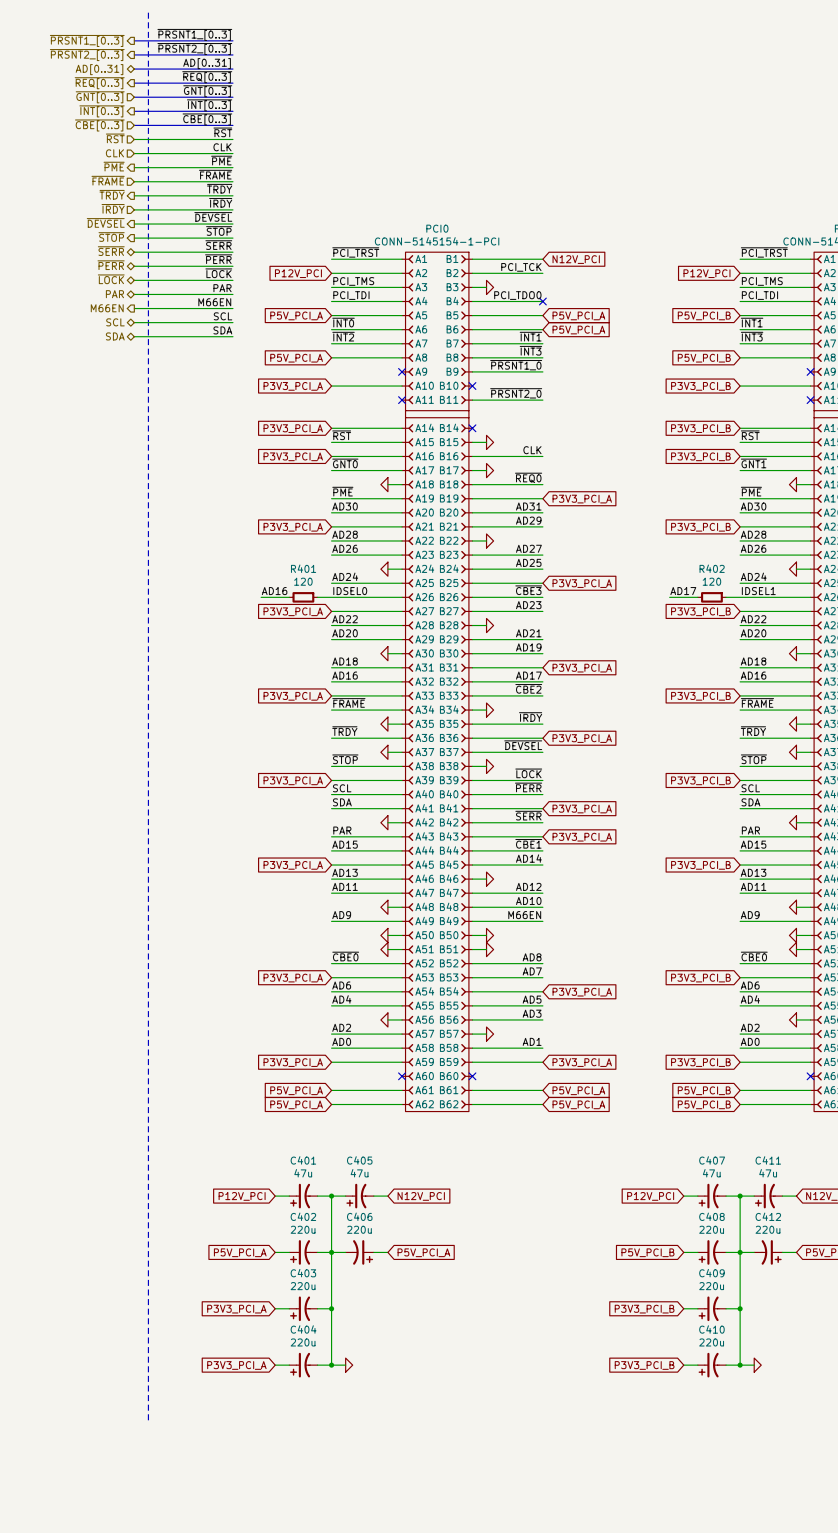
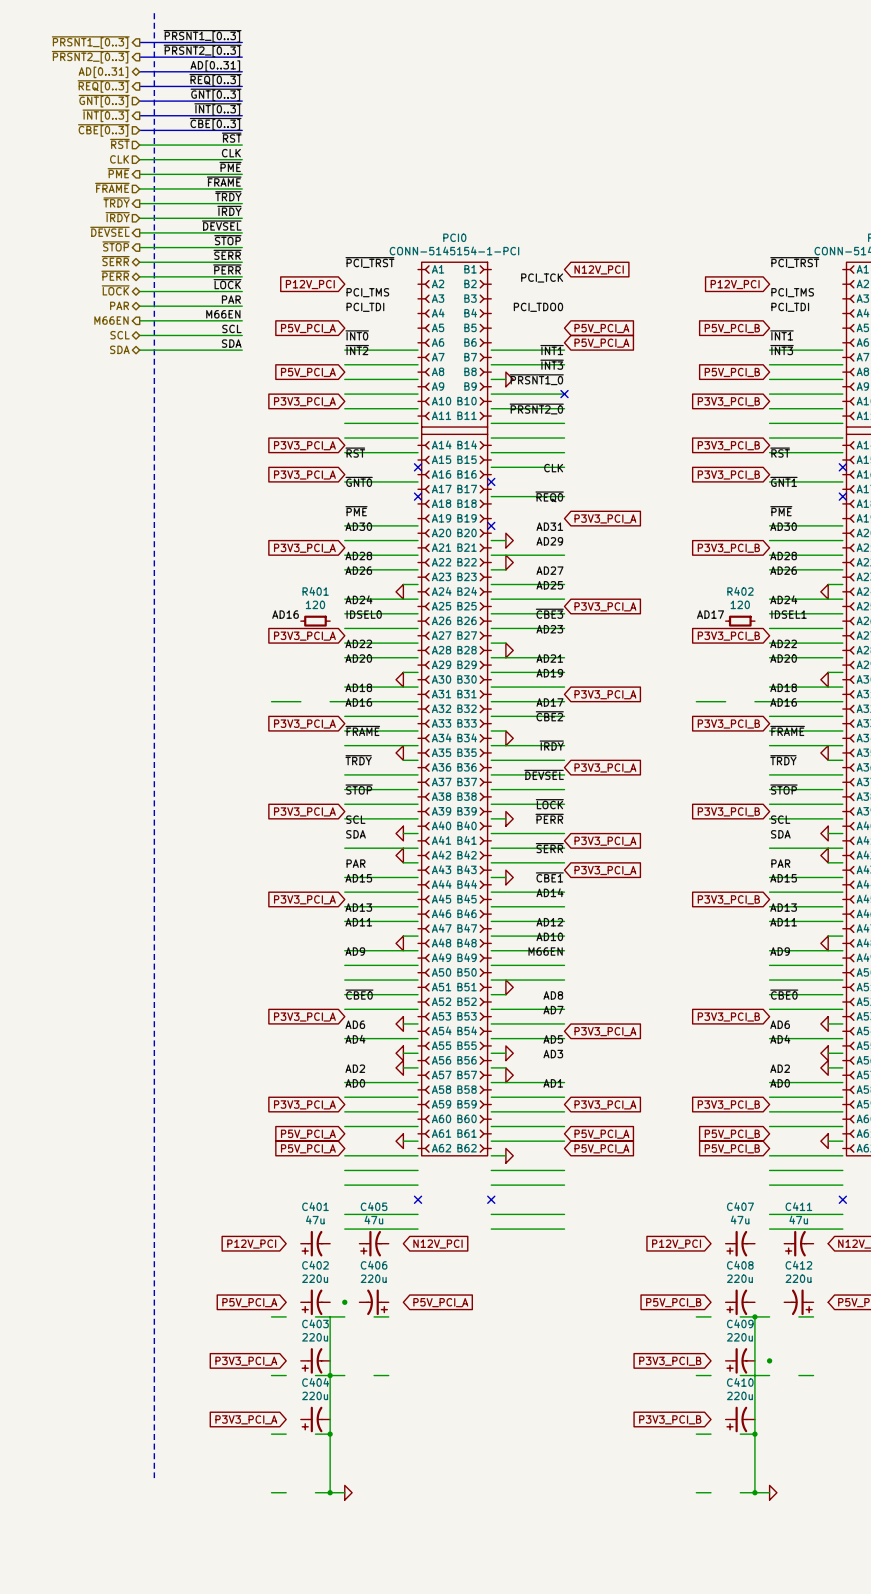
wire: (331, 259) (402, 259) -> (344, 350) (418, 350)
wire: (472, 259) (542, 259) -> (491, 350) (564, 350)
wire: (740, 259) (810, 259) -> (769, 350) (842, 350)
wire: (331, 273) (402, 273) -> (344, 364) (418, 364)
wire: (472, 273) (542, 273) -> (491, 364) (564, 364)
wire: (740, 273) (810, 273) -> (769, 364) (842, 364)
wire: (331, 287) (402, 287) -> (344, 379) (418, 379)
wire: (472, 287) (486, 287) -> (491, 379) (505, 379)
power symbol: (490, 287) -> none
wire: (740, 287) (810, 287) -> (769, 379) (842, 379)
wire: (331, 301) (402, 301) -> (344, 394) (418, 394)
wire: (472, 301) (542, 301) -> (491, 394) (564, 394)
no-connect mark: (542, 301) -> none
wire: (740, 301) (810, 301) -> (769, 394) (842, 394)
wire: (331, 315) (402, 315) -> (344, 408) (418, 408)
wire: (472, 315) (542, 315) -> (491, 408) (564, 408)
wire: (740, 315) (810, 315) -> (769, 408) (842, 408)
wire: (331, 329) (402, 329) -> (344, 423) (418, 423)
wire: (472, 329) (542, 329) -> (491, 423) (564, 423)
wire: (740, 329) (810, 329) -> (769, 423) (842, 423)
wire: (331, 343) (402, 343) -> (344, 438) (418, 438)
wire: (472, 343) (542, 343) -> (491, 438) (564, 438)
wire: (740, 343) (810, 343) -> (769, 438) (842, 438)
wire: (331, 357) (402, 357) -> (344, 452) (418, 452)
wire: (472, 357) (542, 357) -> (491, 452) (564, 452)
wire: (740, 357) (810, 357) -> (769, 452) (842, 452)
power symbol: none -> (509, 379)
no-connect mark: (402, 371) -> none
wire: (472, 371) (542, 371) -> (491, 467) (564, 467)
no-connect mark: (810, 371) -> none
no-connect mark: none -> (564, 394)
wire: (331, 386) (402, 386) -> (344, 481) (418, 481)
no-connect mark: (472, 386) -> none
wire: (740, 386) (810, 386) -> (769, 481) (842, 481)
no-connect mark: (402, 400) -> none
wire: (472, 400) (542, 400) -> (491, 496) (564, 496)
no-connect mark: (810, 400) -> none
wire: (331, 428) (402, 428) -> (344, 525) (418, 525)
no-connect mark: (472, 428) -> none
wire: (740, 428) (810, 428) -> (769, 525) (842, 525)
wire: (331, 442) (402, 442) -> (344, 540) (418, 540)
wire: (472, 442) (486, 442) -> (491, 540) (505, 540)
power symbol: (490, 442) -> none
wire: (740, 442) (810, 442) -> (769, 540) (842, 540)
no-connect mark: none -> (418, 467)
no-connect mark: none -> (842, 467)
wire: (331, 456) (402, 456) -> (344, 555) (418, 555)
wire: (472, 456) (542, 456) -> (491, 555) (564, 555)
wire: (740, 456) (810, 456) -> (769, 555) (842, 555)
no-connect mark: none -> (491, 481)
wire: (331, 470) (402, 470) -> (344, 569) (418, 569)
wire: (472, 470) (486, 470) -> (491, 569) (505, 569)
power symbol: (490, 470) -> none
wire: (740, 470) (810, 470) -> (769, 569) (842, 569)
no-connect mark: none -> (418, 496)
no-connect mark: none -> (842, 496)
power symbol: (384, 484) -> none
wire: (387, 484) (402, 484) -> (403, 584) (418, 584)
wire: (472, 484) (542, 484) -> (491, 584) (564, 584)
power symbol: (792, 484) -> none
wire: (796, 484) (810, 484) -> (828, 584) (842, 584)
wire: (331, 498) (402, 498) -> (344, 599) (418, 599)
wire: (472, 498) (542, 498) -> (491, 599) (564, 599)
wire: (740, 498) (810, 498) -> (769, 599) (842, 599)
no-connect mark: none -> (491, 525)
wire: (331, 512) (402, 512) -> (344, 613) (418, 613)
wire: (472, 512) (542, 512) -> (491, 613) (564, 613)
wire: (740, 512) (810, 512) -> (769, 613) (842, 613)
power symbol: none -> (509, 540)
wire: (331, 526) (402, 526) -> (344, 628) (418, 628)
wire: (472, 526) (542, 526) -> (491, 628) (564, 628)
wire: (740, 526) (810, 526) -> (769, 628) (842, 628)
wire: (331, 540) (402, 540) -> (344, 643) (418, 643)
wire: (472, 540) (486, 540) -> (491, 643) (505, 643)
wire: (740, 540) (810, 540) -> (769, 643) (842, 643)
wire: (331, 555) (402, 555) -> (344, 657) (418, 657)
wire: (472, 555) (542, 555) -> (491, 657) (564, 657)
wire: (740, 555) (810, 555) -> (769, 657) (842, 657)
wire: (387, 569) (402, 569) -> (403, 672) (418, 672)
wire: (472, 569) (542, 569) -> (491, 672) (564, 672)
wire: (796, 569) (810, 569) -> (828, 672) (842, 672)
wire: (331, 583) (402, 583) -> (344, 687) (418, 687)
wire: (472, 583) (542, 583) -> (491, 687) (564, 687)
wire: (740, 583) (810, 583) -> (769, 687) (842, 687)
wire: (261, 597) (289, 597) -> (271, 701) (300, 701)
wire: (317, 597) (402, 597) -> (330, 701) (418, 701)
wire: (472, 597) (542, 597) -> (491, 701) (564, 701)
wire: (669, 597) (697, 597) -> (696, 701) (725, 701)
wire: (726, 597) (810, 597) -> (754, 701) (842, 701)
wire: (331, 611) (402, 611) -> (344, 716) (418, 716)
wire: (472, 611) (542, 611) -> (491, 716) (564, 716)
wire: (740, 611) (810, 611) -> (769, 716) (842, 716)
wire: (331, 625) (402, 625) -> (344, 730) (418, 730)
wire: (472, 625) (486, 625) -> (491, 730) (505, 730)
wire: (740, 625) (810, 625) -> (769, 730) (842, 730)
wire: (331, 639) (402, 639) -> (344, 745) (418, 745)
wire: (472, 639) (542, 639) -> (491, 745) (564, 745)
wire: (740, 639) (810, 639) -> (769, 745) (842, 745)
wire: (387, 653) (402, 653) -> (403, 760) (418, 760)
wire: (472, 653) (542, 653) -> (491, 760) (564, 760)
wire: (796, 653) (810, 653) -> (828, 760) (842, 760)
wire: (331, 667) (402, 667) -> (344, 774) (418, 774)
wire: (472, 667) (542, 667) -> (491, 774) (564, 774)
wire: (740, 667) (810, 667) -> (769, 774) (842, 774)
wire: (331, 681) (402, 681) -> (344, 789) (418, 789)
wire: (472, 681) (542, 681) -> (491, 789) (564, 789)
wire: (740, 681) (810, 681) -> (769, 789) (842, 789)
wire: (331, 695) (402, 695) -> (344, 804) (418, 804)
wire: (472, 695) (542, 695) -> (491, 804) (564, 804)
wire: (740, 695) (810, 695) -> (769, 804) (842, 804)
wire: (331, 710) (402, 710) -> (344, 818) (418, 818)
wire: (472, 710) (486, 710) -> (491, 818) (505, 818)
wire: (740, 710) (810, 710) -> (769, 818) (842, 818)
wire: (387, 724) (402, 724) -> (403, 833) (418, 833)
wire: (472, 724) (542, 724) -> (491, 833) (564, 833)
wire: (796, 724) (810, 724) -> (828, 833) (842, 833)
wire: (331, 738) (402, 738) -> (344, 848) (418, 848)
wire: (472, 738) (542, 738) -> (491, 848) (564, 848)
wire: (740, 738) (810, 738) -> (769, 848) (842, 848)
power symbol position: (384, 752) -> (399, 833)
wire: (387, 752) (402, 752) -> (403, 862) (418, 862)
wire: (472, 752) (542, 752) -> (491, 862) (564, 862)
power symbol position: (792, 752) -> (824, 833)
wire: (796, 752) (810, 752) -> (828, 862) (842, 862)
wire: (331, 766) (402, 766) -> (344, 877) (418, 877)
wire: (472, 766) (486, 766) -> (491, 877) (505, 877)
power symbol position: (490, 766) -> (509, 818)
wire: (740, 766) (810, 766) -> (769, 877) (842, 877)
wire: (331, 780) (402, 780) -> (344, 892) (418, 892)
wire: (472, 780) (542, 780) -> (491, 892) (564, 892)
wire: (740, 780) (810, 780) -> (769, 892) (842, 892)
wire: (331, 794) (402, 794) -> (344, 906) (418, 906)
wire: (472, 794) (542, 794) -> (491, 906) (564, 906)
wire: (740, 794) (810, 794) -> (769, 906) (842, 906)
wire: (331, 808) (402, 808) -> (344, 921) (418, 921)
wire: (472, 808) (542, 808) -> (491, 921) (564, 921)
wire: (740, 808) (810, 808) -> (769, 921) (842, 921)
wire: (387, 822) (402, 822) -> (403, 936) (418, 936)
wire: (472, 822) (542, 822) -> (491, 936) (564, 936)
wire: (796, 822) (810, 822) -> (828, 936) (842, 936)
wire: (331, 836) (402, 836) -> (344, 950) (418, 950)
wire: (472, 836) (542, 836) -> (491, 950) (564, 950)
wire: (740, 836) (810, 836) -> (769, 950) (842, 950)
wire: (331, 850) (402, 850) -> (344, 965) (418, 965)
wire: (472, 850) (542, 850) -> (491, 965) (564, 965)
wire: (740, 850) (810, 850) -> (769, 965) (842, 965)
wire: (331, 865) (402, 865) -> (344, 980) (418, 980)
wire: (472, 865) (542, 865) -> (491, 980) (564, 980)
wire: (740, 865) (810, 865) -> (769, 980) (842, 980)
wire: (331, 879) (402, 879) -> (344, 994) (418, 994)
wire: (472, 879) (486, 879) -> (491, 994) (505, 994)
power symbol position: (490, 879) -> (509, 877)
wire: (740, 879) (810, 879) -> (769, 994) (842, 994)
wire: (331, 893) (402, 893) -> (344, 1009) (418, 1009)
wire: (472, 893) (542, 893) -> (491, 1009) (564, 1009)
wire: (740, 893) (810, 893) -> (769, 1009) (842, 1009)
wire: (387, 907) (402, 907) -> (403, 1023) (418, 1023)
wire: (472, 907) (542, 907) -> (491, 1023) (564, 1023)
wire: (796, 907) (810, 907) -> (828, 1023) (842, 1023)
wire: (331, 921) (402, 921) -> (344, 1038) (418, 1038)
wire: (472, 921) (542, 921) -> (491, 1038) (564, 1038)
wire: (740, 921) (810, 921) -> (769, 1038) (842, 1038)
power symbol: (384, 935) -> none
wire: (387, 935) (402, 935) -> (403, 1053) (418, 1053)
wire: (472, 935) (486, 935) -> (491, 1053) (505, 1053)
power symbol: (490, 935) -> none
power symbol: (792, 935) -> none
wire: (796, 935) (810, 935) -> (828, 1053) (842, 1053)
power symbol: (384, 949) -> none
wire: (387, 949) (402, 949) -> (403, 1067) (418, 1067)
wire: (472, 949) (486, 949) -> (491, 1067) (505, 1067)
power symbol: (792, 949) -> none
wire: (796, 949) (810, 949) -> (828, 1067) (842, 1067)
wire: (331, 963) (402, 963) -> (344, 1082) (418, 1082)
wire: (472, 963) (542, 963) -> (491, 1082) (564, 1082)
wire: (740, 963) (810, 963) -> (769, 1082) (842, 1082)
wire: (331, 977) (402, 977) -> (344, 1097) (418, 1097)
wire: (472, 977) (542, 977) -> (491, 1097) (564, 1097)
wire: (740, 977) (810, 977) -> (769, 1097) (842, 1097)
power symbol: none -> (399, 1023)
power symbol: none -> (824, 1023)
wire: (331, 991) (402, 991) -> (344, 1111) (418, 1111)
wire: (472, 991) (542, 991) -> (491, 1111) (564, 1111)
wire: (740, 991) (810, 991) -> (769, 1111) (842, 1111)
wire: (331, 1005) (402, 1005) -> (344, 1126) (418, 1126)
wire: (472, 1005) (542, 1005) -> (491, 1126) (564, 1126)
wire: (740, 1005) (810, 1005) -> (769, 1126) (842, 1126)
power symbol: none -> (399, 1053)
power symbol: none -> (509, 1053)
power symbol: none -> (824, 1053)
power symbol: (384, 1019) -> none
wire: (387, 1019) (402, 1019) -> (403, 1141) (418, 1141)
wire: (472, 1019) (542, 1019) -> (491, 1141) (564, 1141)
power symbol: (792, 1019) -> none
wire: (796, 1019) (810, 1019) -> (828, 1141) (842, 1141)
power symbol: none -> (399, 1067)
power symbol: none -> (824, 1067)
wire: (331, 1034) (402, 1034) -> (344, 1155) (418, 1155)
wire: (472, 1034) (486, 1034) -> (491, 1155) (505, 1155)
wire: (740, 1034) (810, 1034) -> (769, 1155) (842, 1155)
wire: (331, 1048) (402, 1048) -> (344, 1170) (418, 1170)
wire: (472, 1048) (542, 1048) -> (491, 1170) (564, 1170)
wire: (740, 1048) (810, 1048) -> (769, 1170) (842, 1170)
wire: (331, 1062) (402, 1062) -> (344, 1185) (418, 1185)
wire: (472, 1062) (542, 1062) -> (491, 1185) (564, 1185)
wire: (740, 1062) (810, 1062) -> (769, 1185) (842, 1185)
no-connect mark: (402, 1076) -> none
no-connect mark: (472, 1076) -> none
no-connect mark: (810, 1076) -> none
wire: (331, 1090) (402, 1090) -> (344, 1214) (418, 1214)
wire: (472, 1090) (542, 1090) -> (491, 1214) (564, 1214)
wire: (740, 1090) (810, 1090) -> (769, 1214) (842, 1214)
power symbol: none -> (399, 1141)
power symbol: none -> (824, 1141)
wire: (331, 1104) (402, 1104) -> (344, 1229) (418, 1229)
wire: (472, 1104) (542, 1104) -> (491, 1229) (564, 1229)
wire: (740, 1104) (810, 1104) -> (769, 1229) (842, 1229)
power symbol: none -> (509, 1155)
no-connect mark: none -> (418, 1199)
no-connect mark: none -> (491, 1199)
no-connect mark: none -> (842, 1199)
wire: (275, 1196) (289, 1196) -> (271, 1316) (286, 1316)
wire: (317, 1196) (345, 1196) -> (315, 1316) (344, 1316)
wire: (331, 1196) (331, 1365) -> (330, 1316) (330, 1492)
junction: (331, 1196) -> none
wire: (373, 1196) (387, 1196) -> (374, 1316) (388, 1316)
wire: (683, 1196) (697, 1196) -> (696, 1316) (710, 1316)
wire: (726, 1196) (754, 1196) -> (740, 1316) (769, 1316)
wire: (740, 1196) (740, 1365) -> (754, 1316) (754, 1492)
junction: (740, 1196) -> none
wire: (782, 1196) (796, 1196) -> (798, 1316) (813, 1316)
wire: (275, 1252) (289, 1252) -> (271, 1375) (286, 1375)
wire: (317, 1252) (345, 1252) -> (315, 1375) (344, 1375)
wire: (373, 1252) (387, 1252) -> (374, 1375) (388, 1375)
wire: (683, 1252) (697, 1252) -> (696, 1375) (710, 1375)
wire: (726, 1252) (754, 1252) -> (740, 1375) (769, 1375)
junction position: (740, 1252) -> (754, 1316)
wire: (782, 1252) (796, 1252) -> (798, 1375) (813, 1375)
wire: (275, 1308) (289, 1308) -> (271, 1434) (286, 1434)
wire: (317, 1308) (331, 1308) -> (315, 1434) (330, 1434)
junction position: (331, 1308) -> (330, 1375)
wire: (683, 1308) (697, 1308) -> (696, 1434) (710, 1434)
wire: (726, 1308) (740, 1308) -> (740, 1434) (754, 1434)
wire: (275, 1365) (289, 1365) -> (271, 1492) (286, 1492)
wire: (317, 1365) (345, 1365) -> (315, 1492) (344, 1492)
junction position: (331, 1365) -> (330, 1434)
power symbol position: (349, 1365) -> (348, 1492)
wire: (683, 1365) (697, 1365) -> (696, 1492) (710, 1492)
wire: (726, 1365) (754, 1365) -> (740, 1492) (769, 1492)
junction position: (740, 1365) -> (754, 1434)
power symbol position: (757, 1365) -> (773, 1492)
junction: none -> (330, 1492)
junction: none -> (754, 1492)

